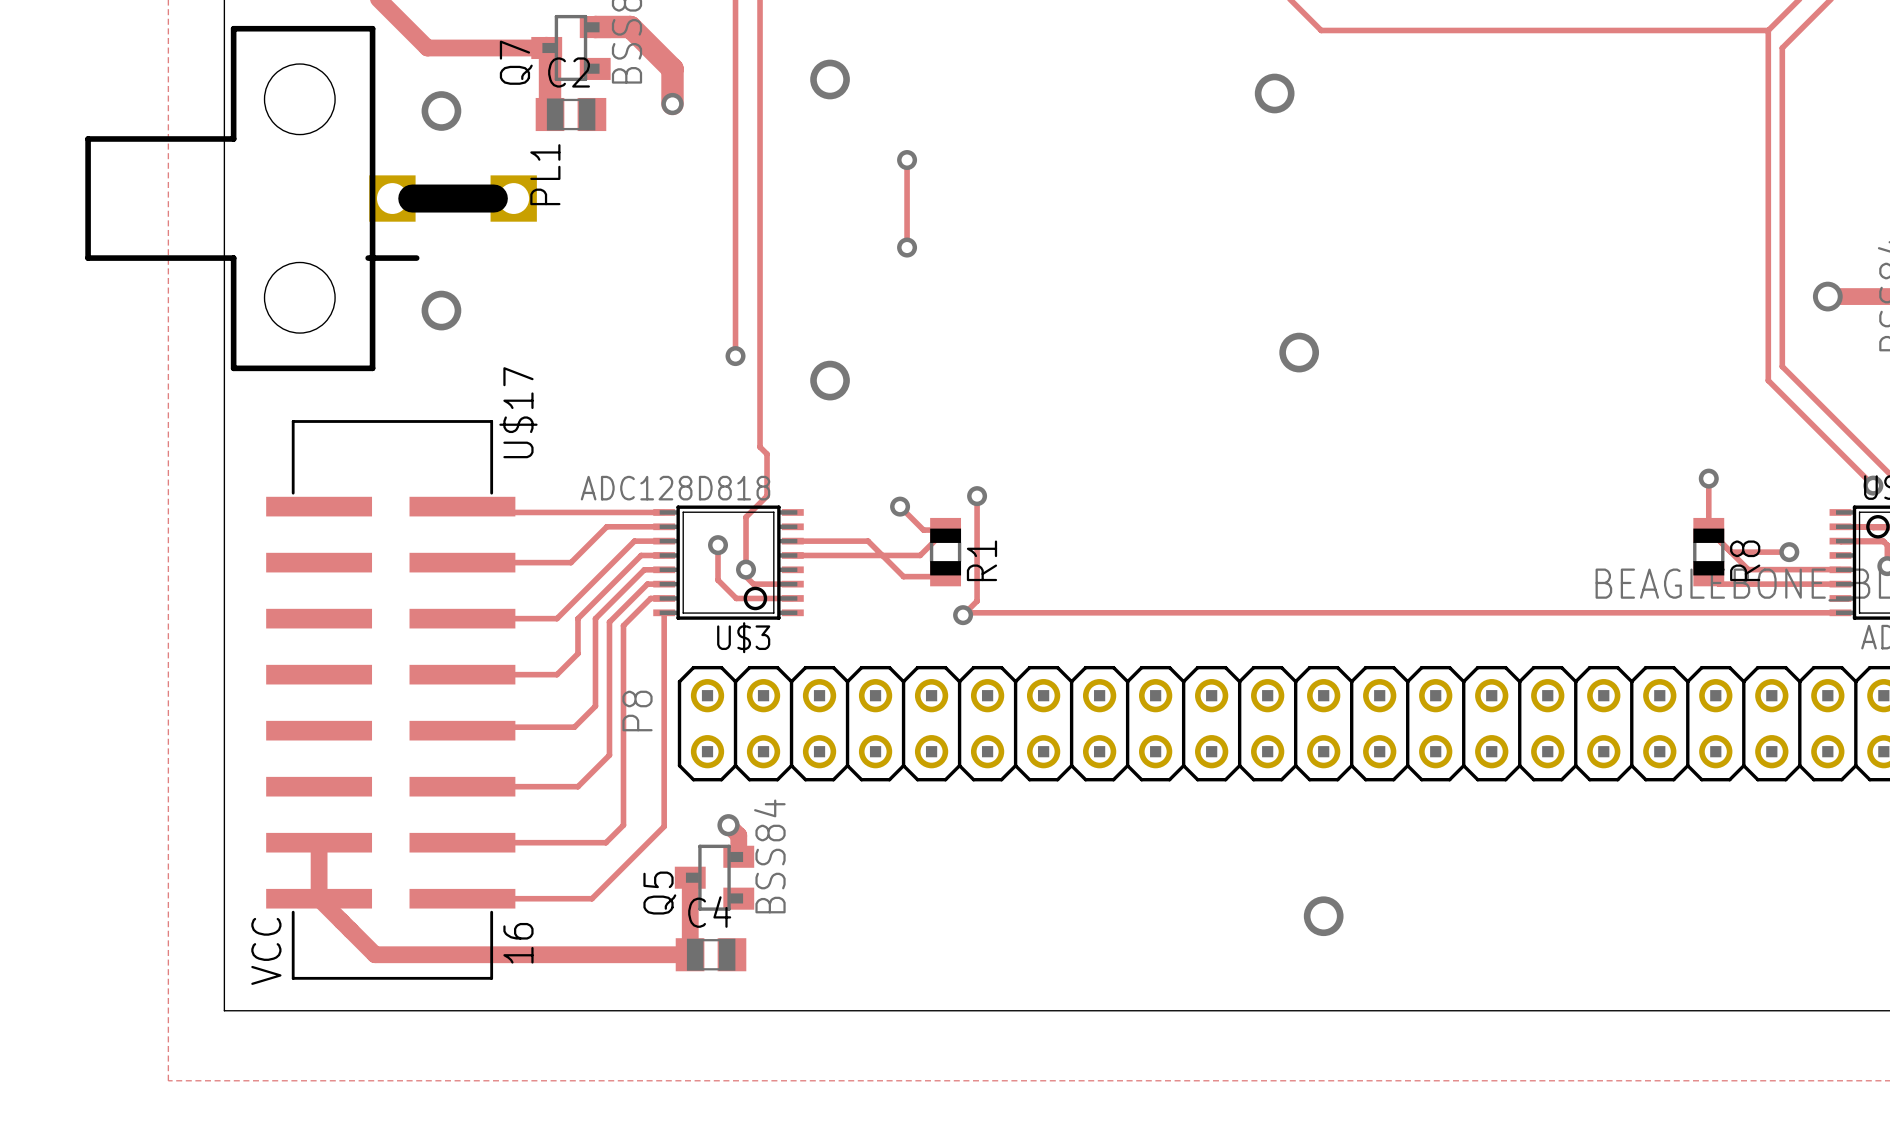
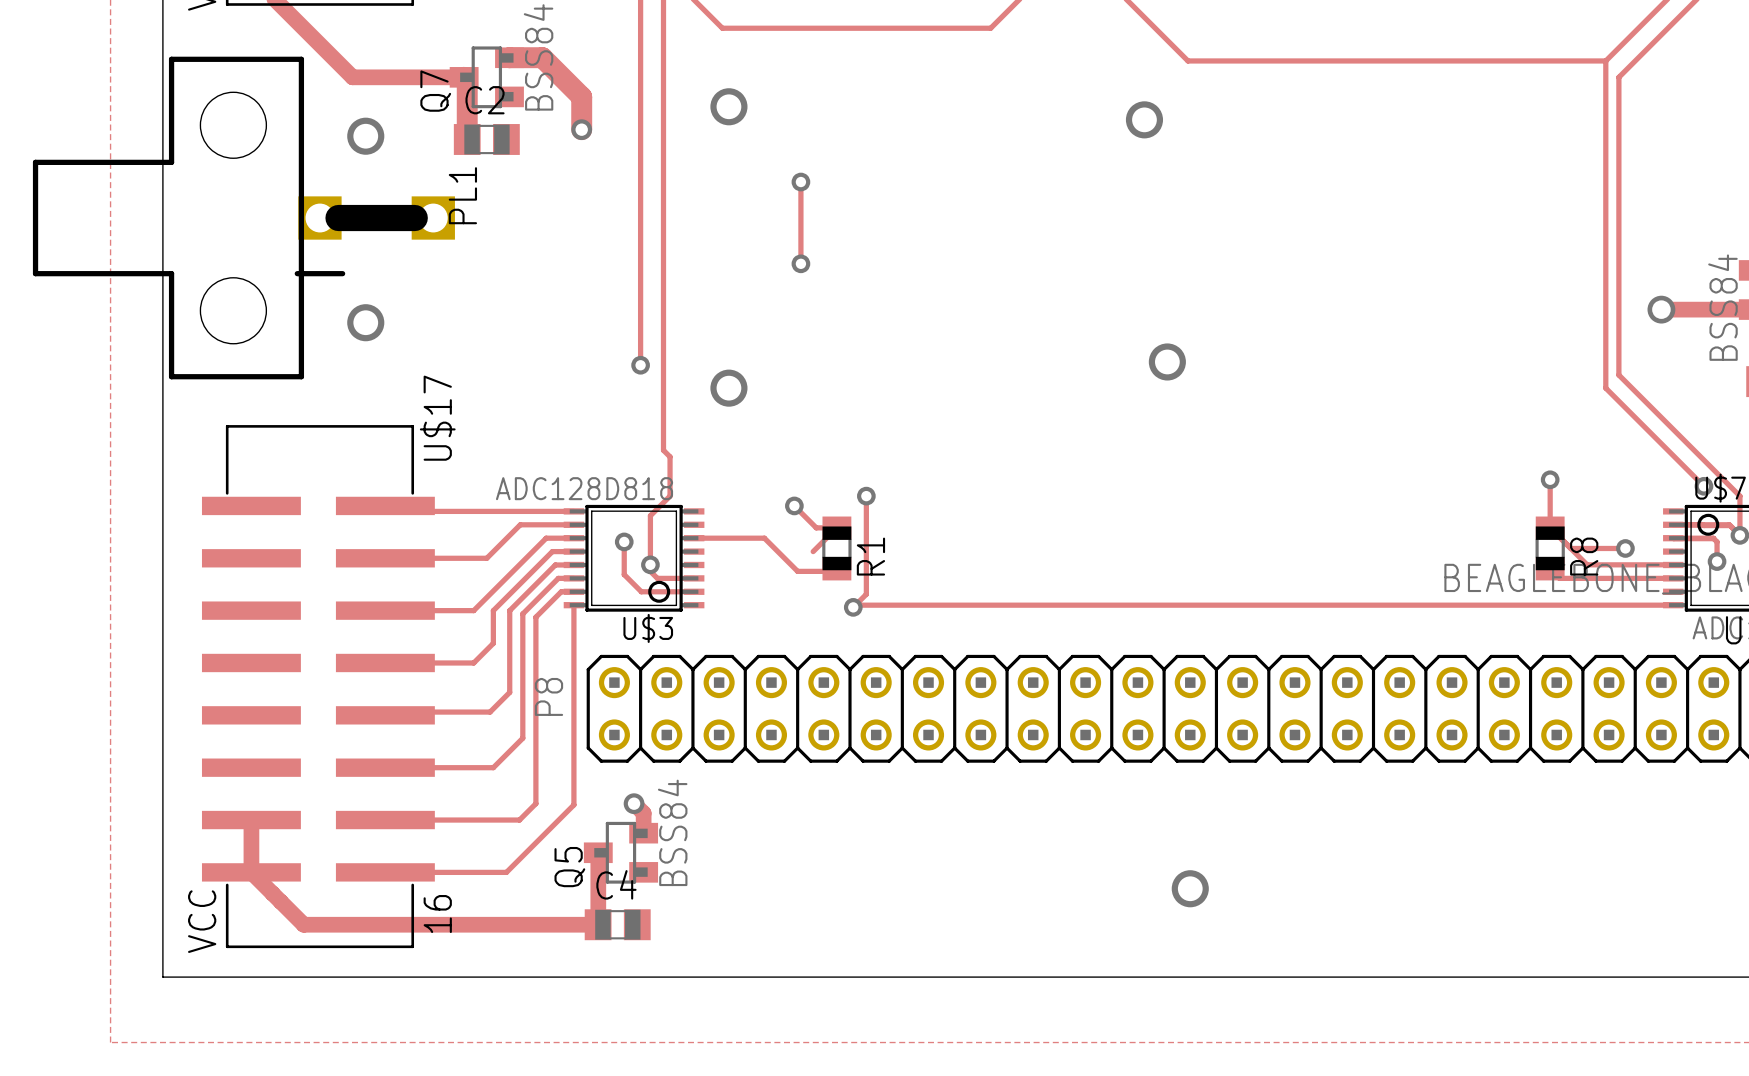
track: (792, 555) (920, 555) -> none

